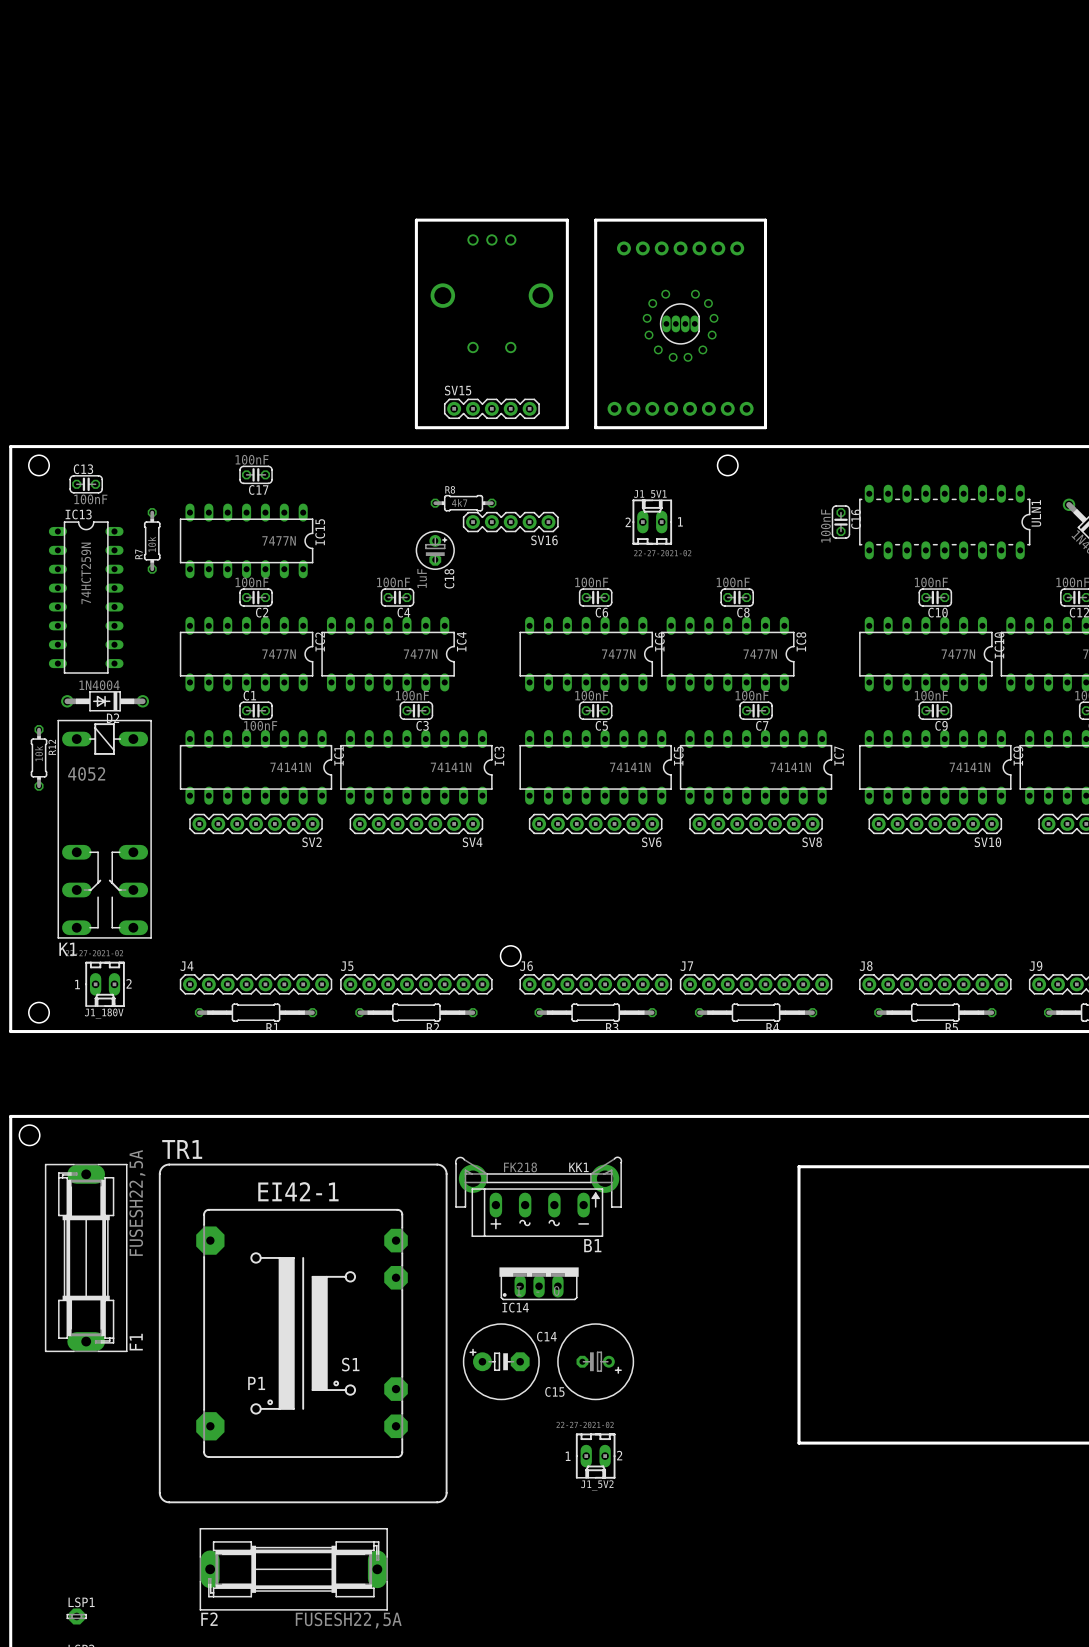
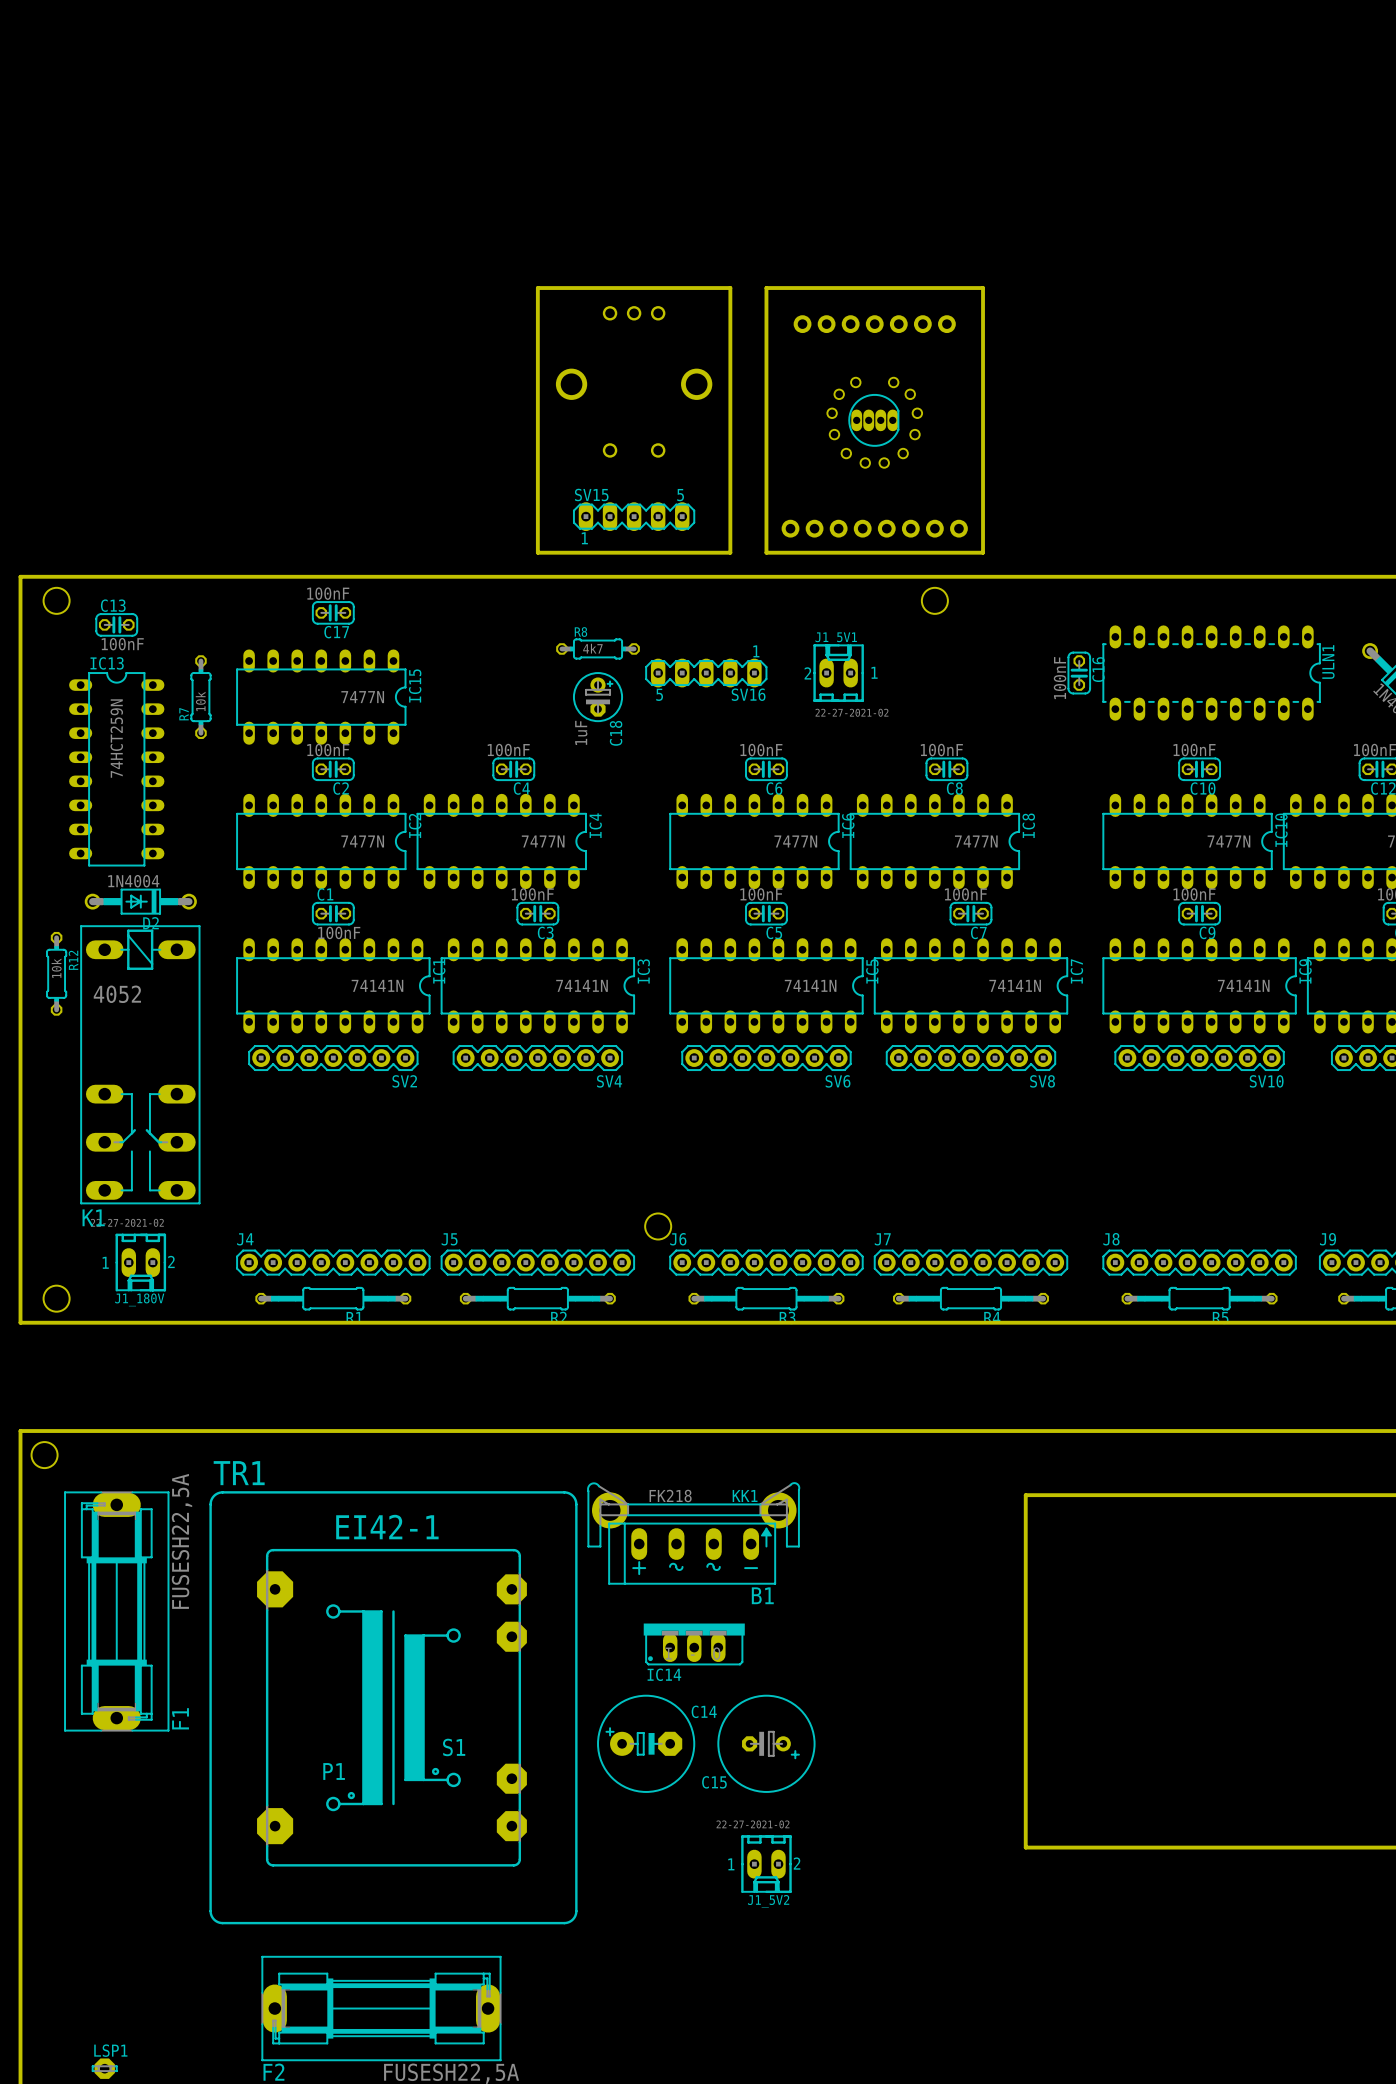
SV15 footprint: [443, 398, 540, 420] -> [573, 502, 695, 532]
SV16 footprint: [462, 511, 559, 533] -> [645, 658, 768, 688]
C18 position: (435, 550) -> (598, 697)

